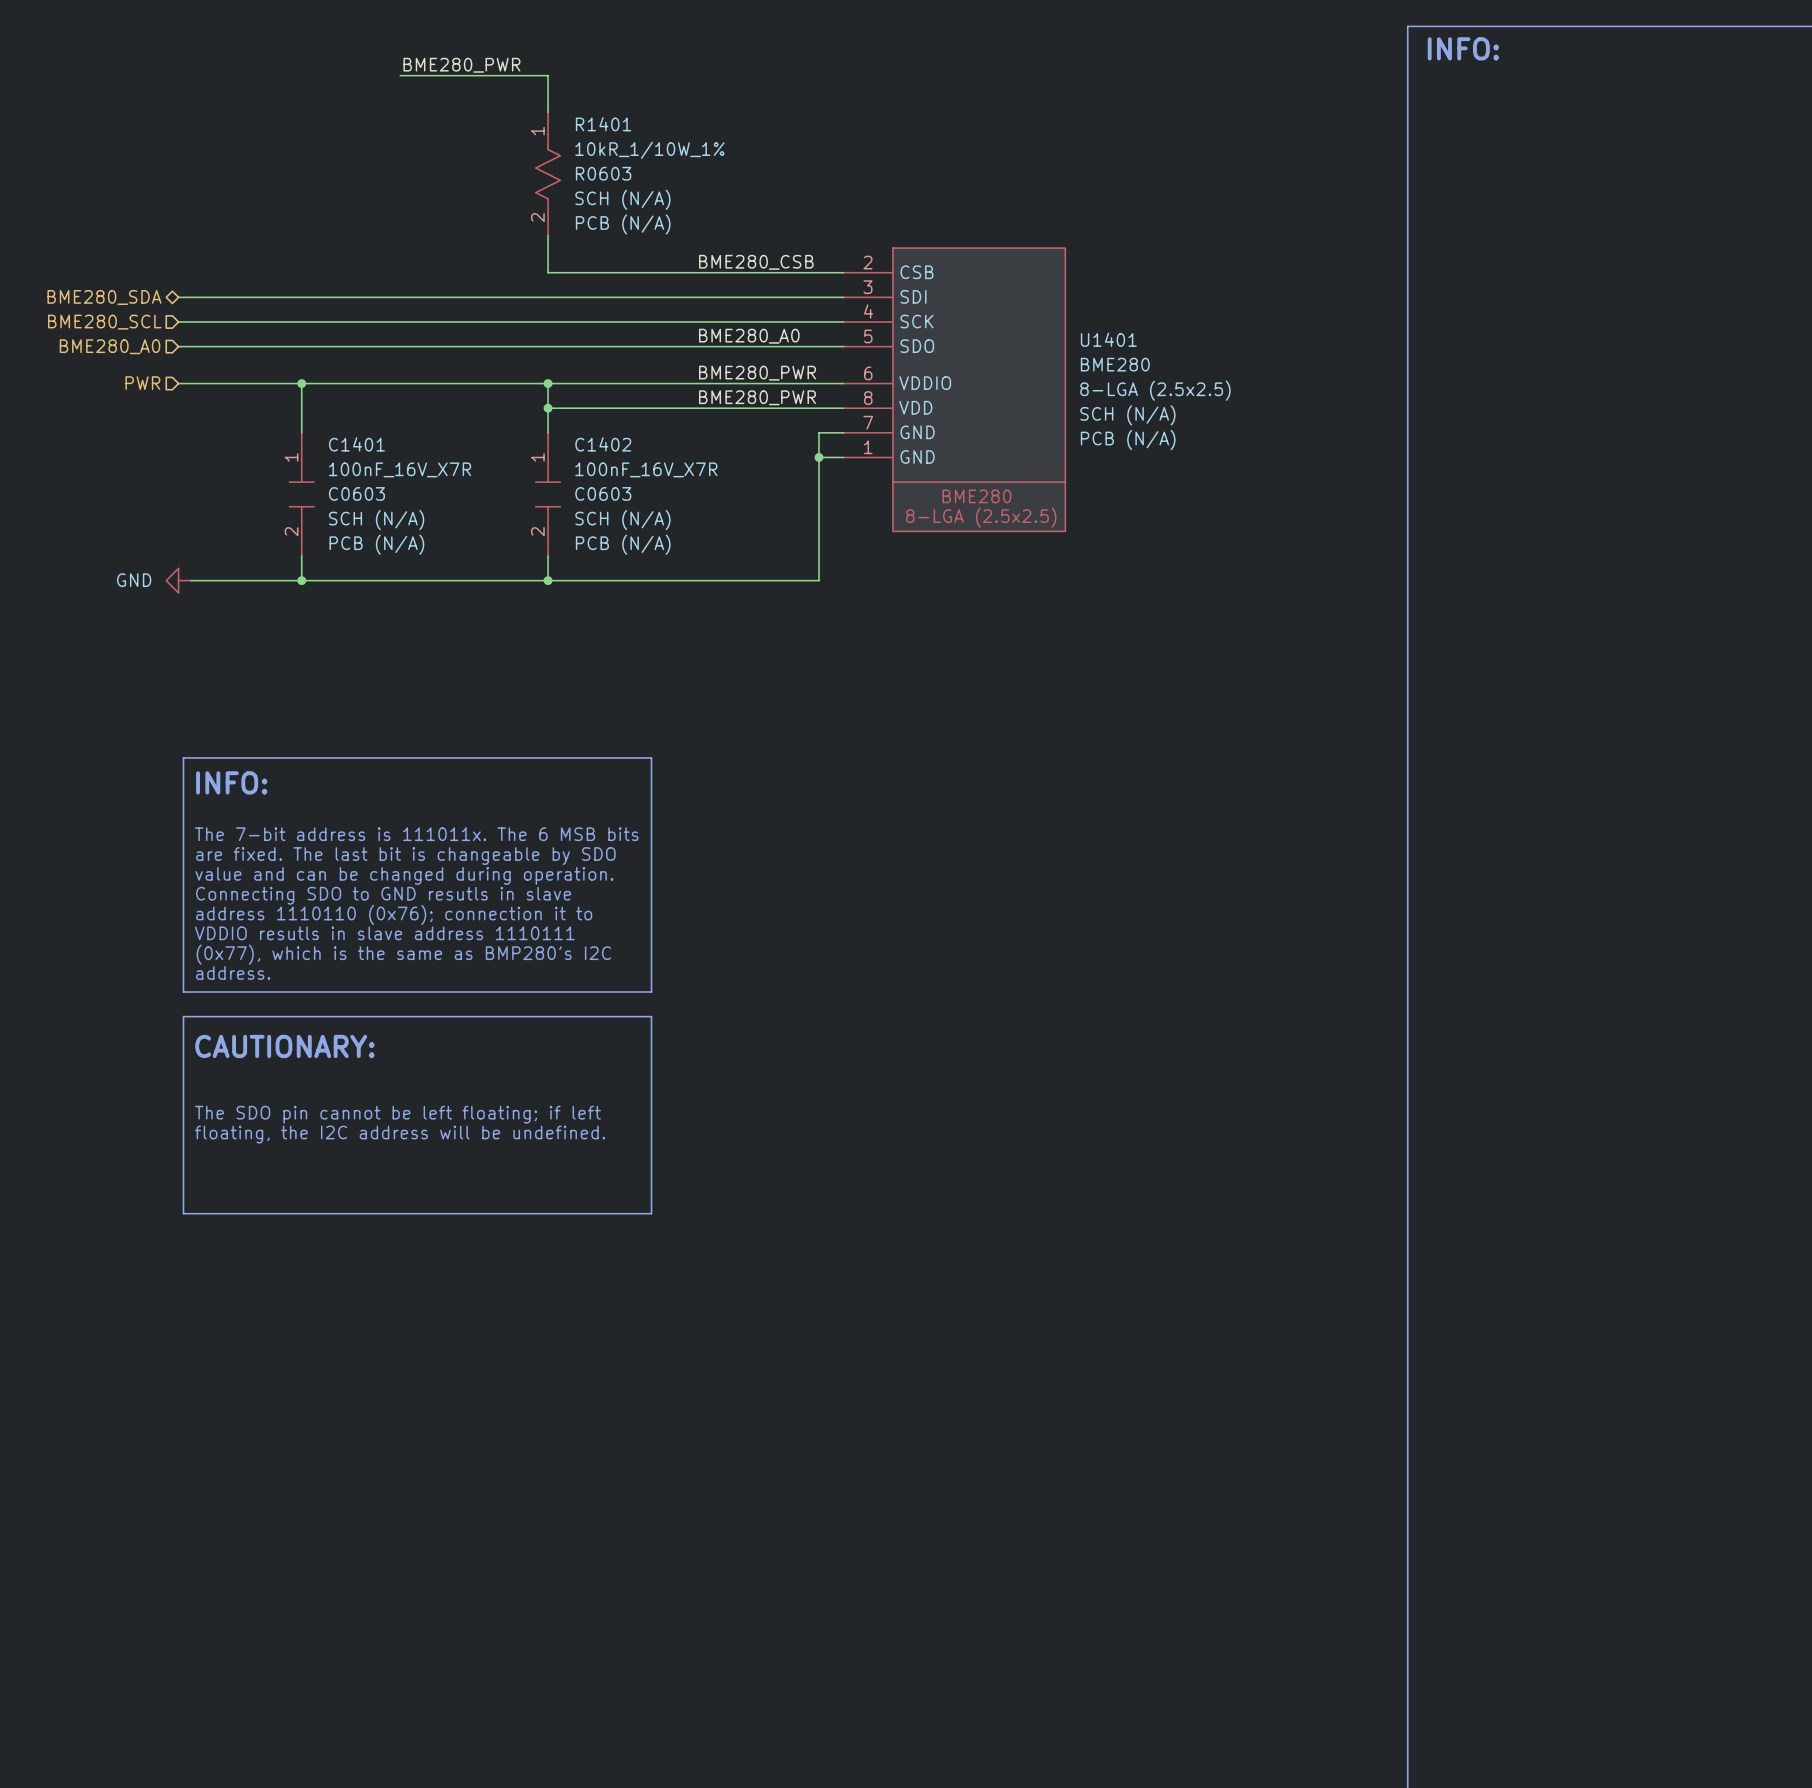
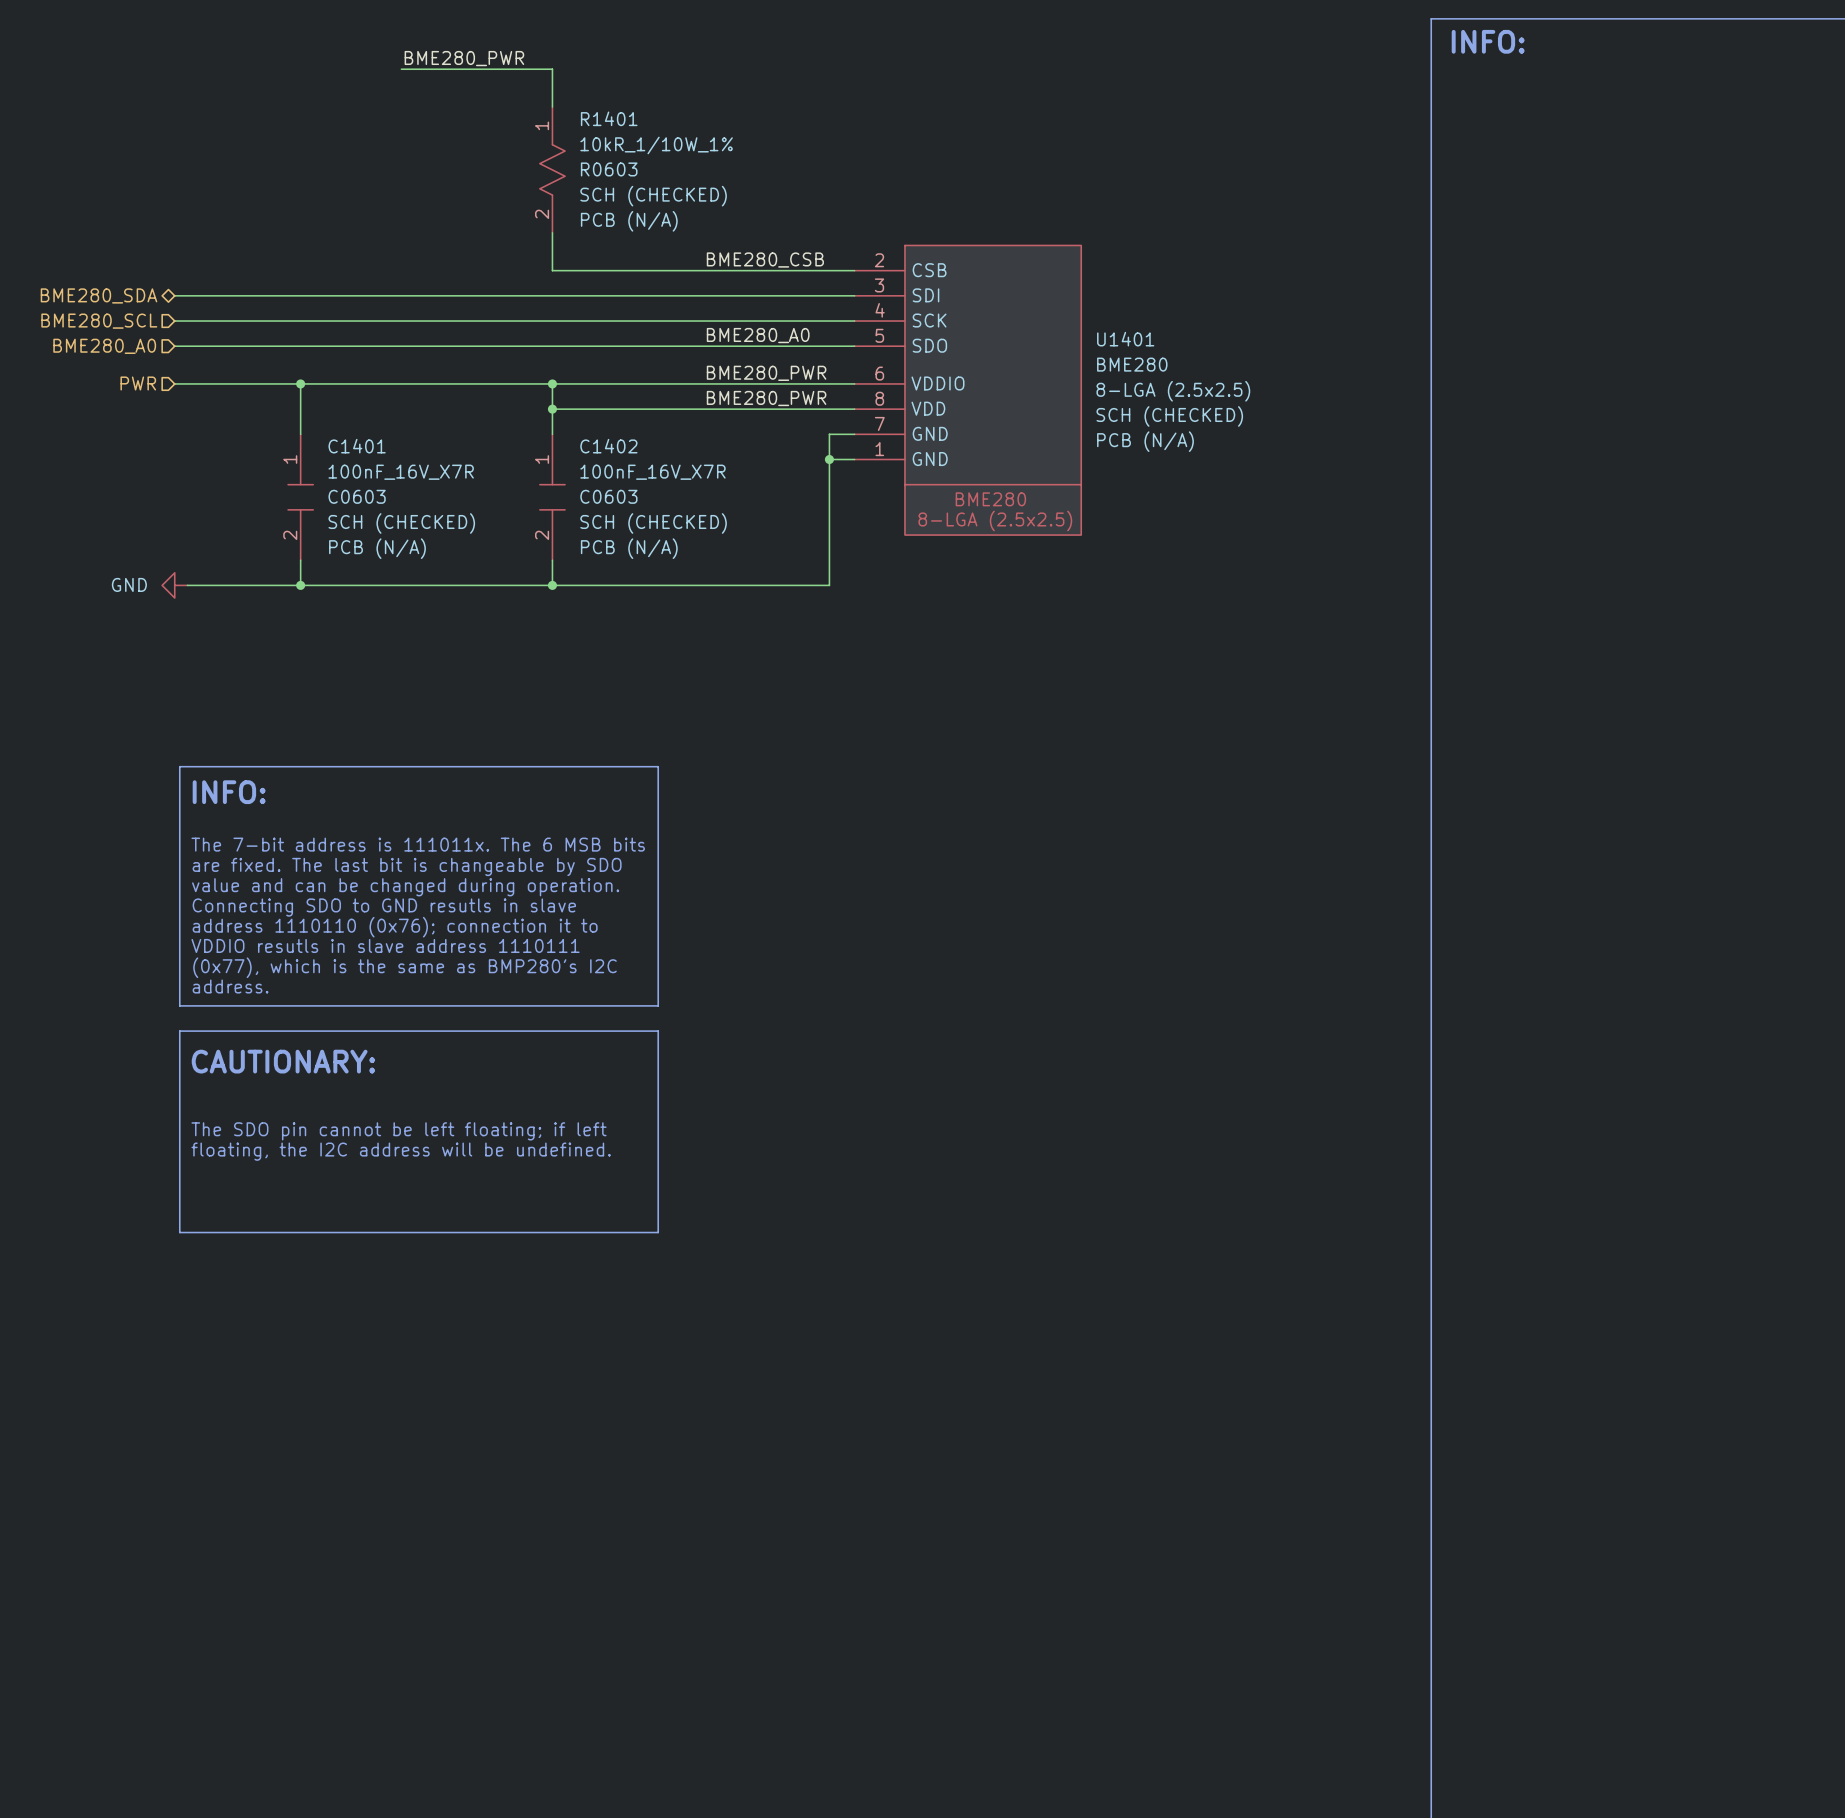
R1401 text: SCH (N/A) (622, 199) -> SCH (CHECKED) (653, 196)
U1401 text: SCH (N/A) (1127, 415) -> SCH (CHECKED) (1169, 416)
C1401 text: SCH (N/A) (376, 520) -> SCH (CHECKED) (401, 523)
C1402 text: SCH (N/A) (622, 520) -> SCH (CHECKED) (653, 523)

